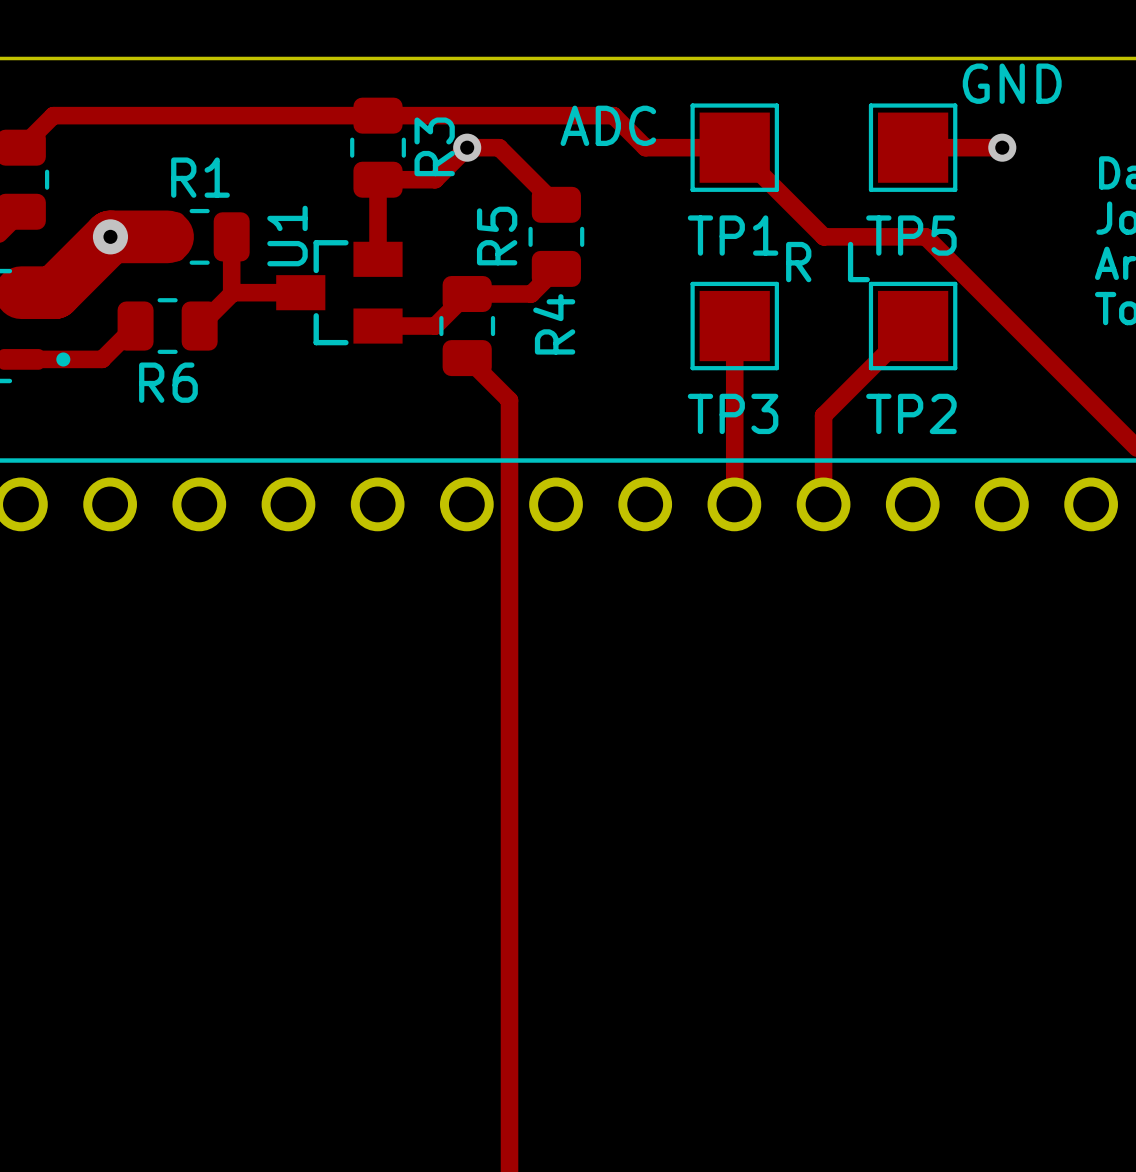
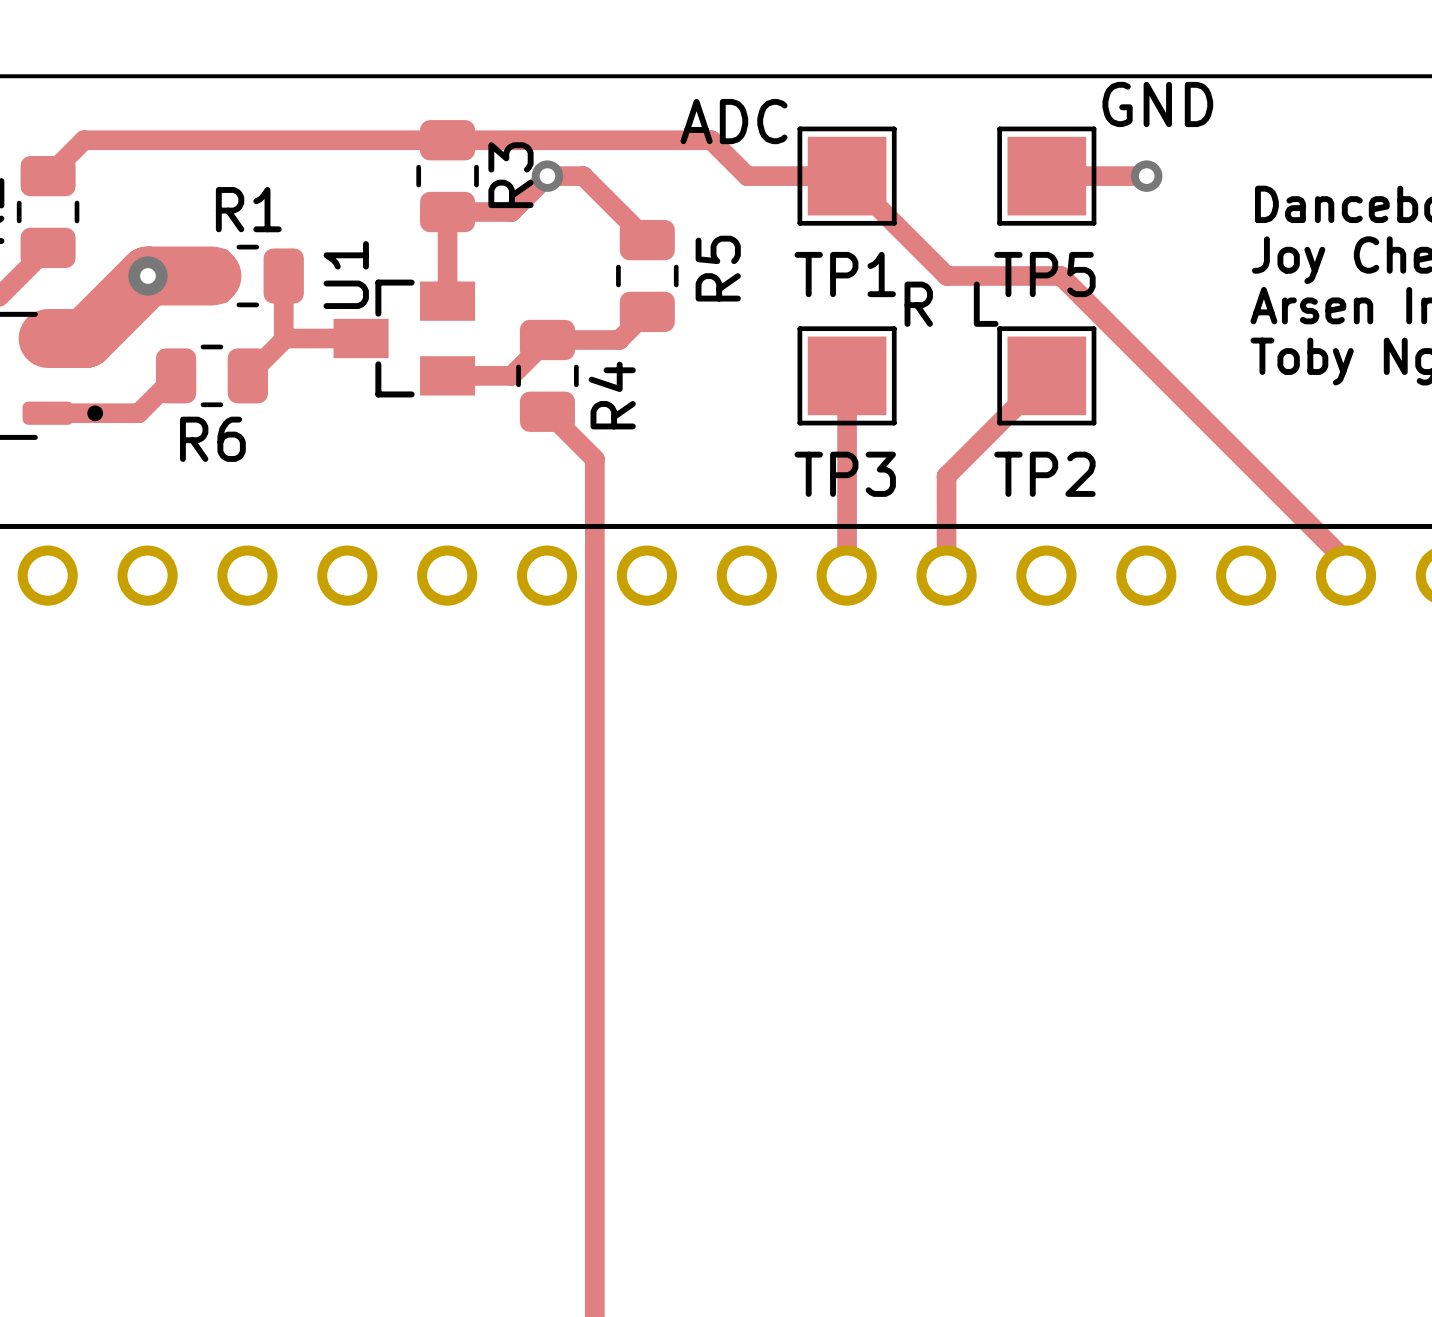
text position: ADC (608, 125) -> ADC (734, 121)
R5 name position: R5 (497, 236) -> R5 (718, 268)
R4 name position: R4 (554, 324) -> R4 (612, 395)

